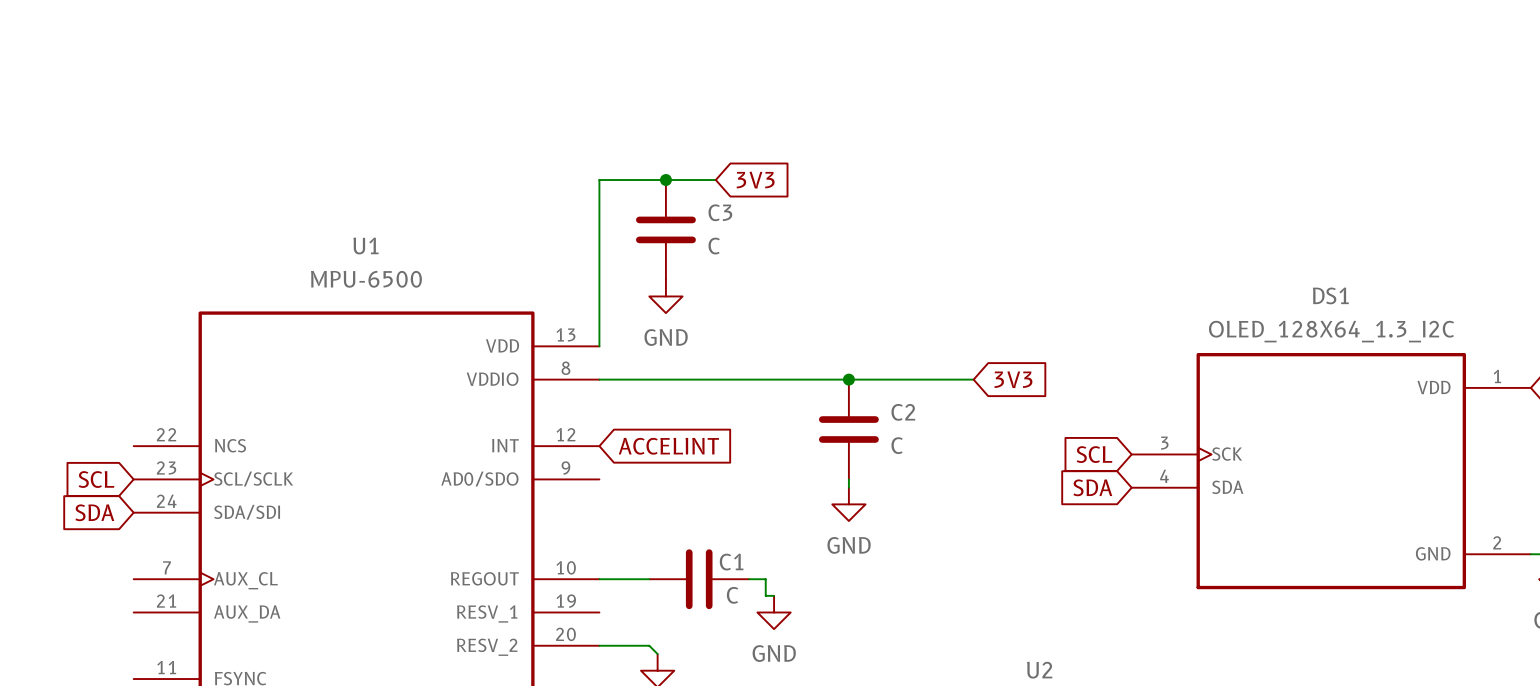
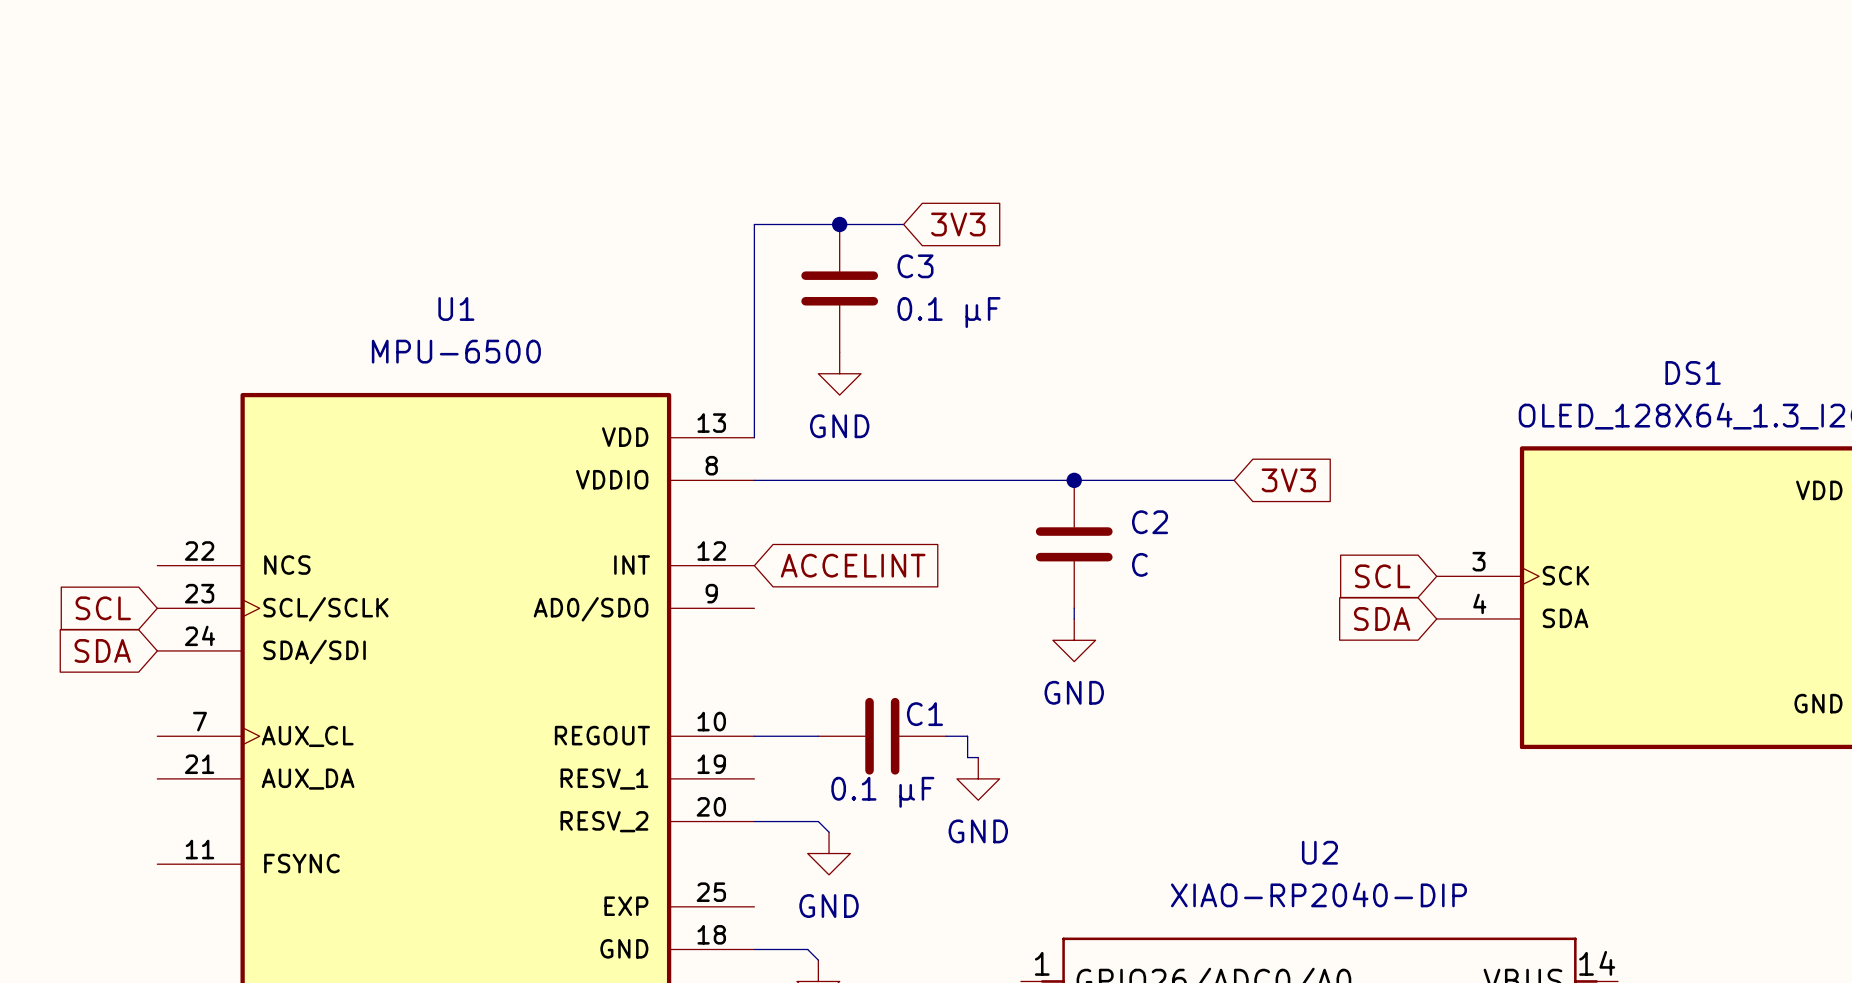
C3 value: C (714, 246) -> 0.1 µF (948, 312)
C1 value: C (732, 595) -> 0.1 µF (882, 792)

